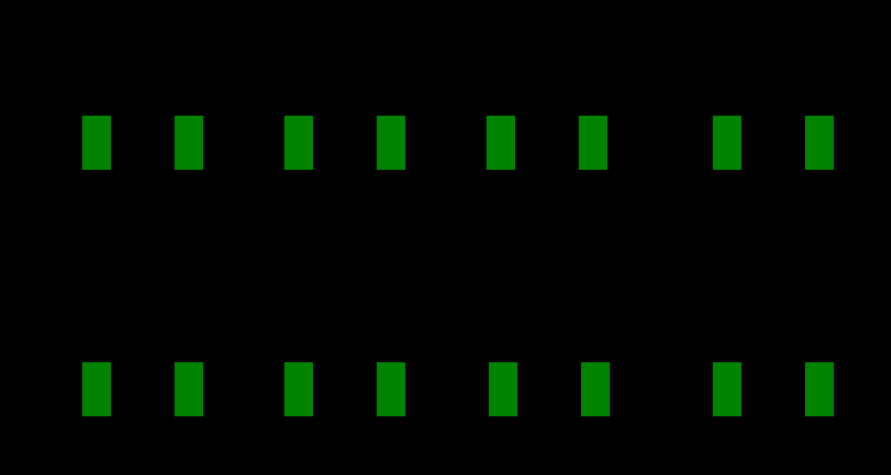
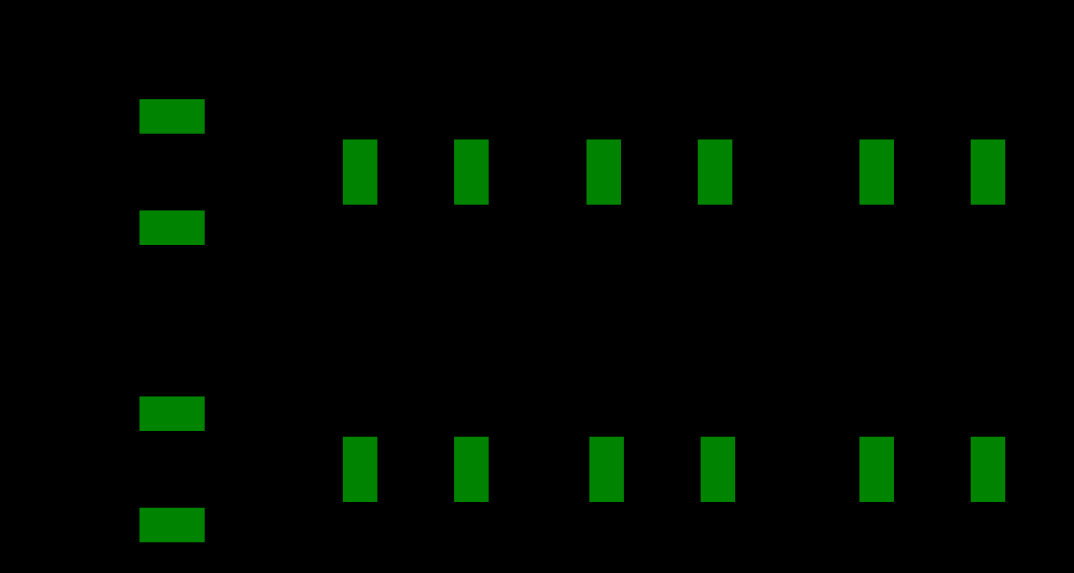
part rotation: 0° (142, 142) -> 90° clockwise (172, 172)
part rotation: 0° (142, 389) -> 90° clockwise (172, 469)

